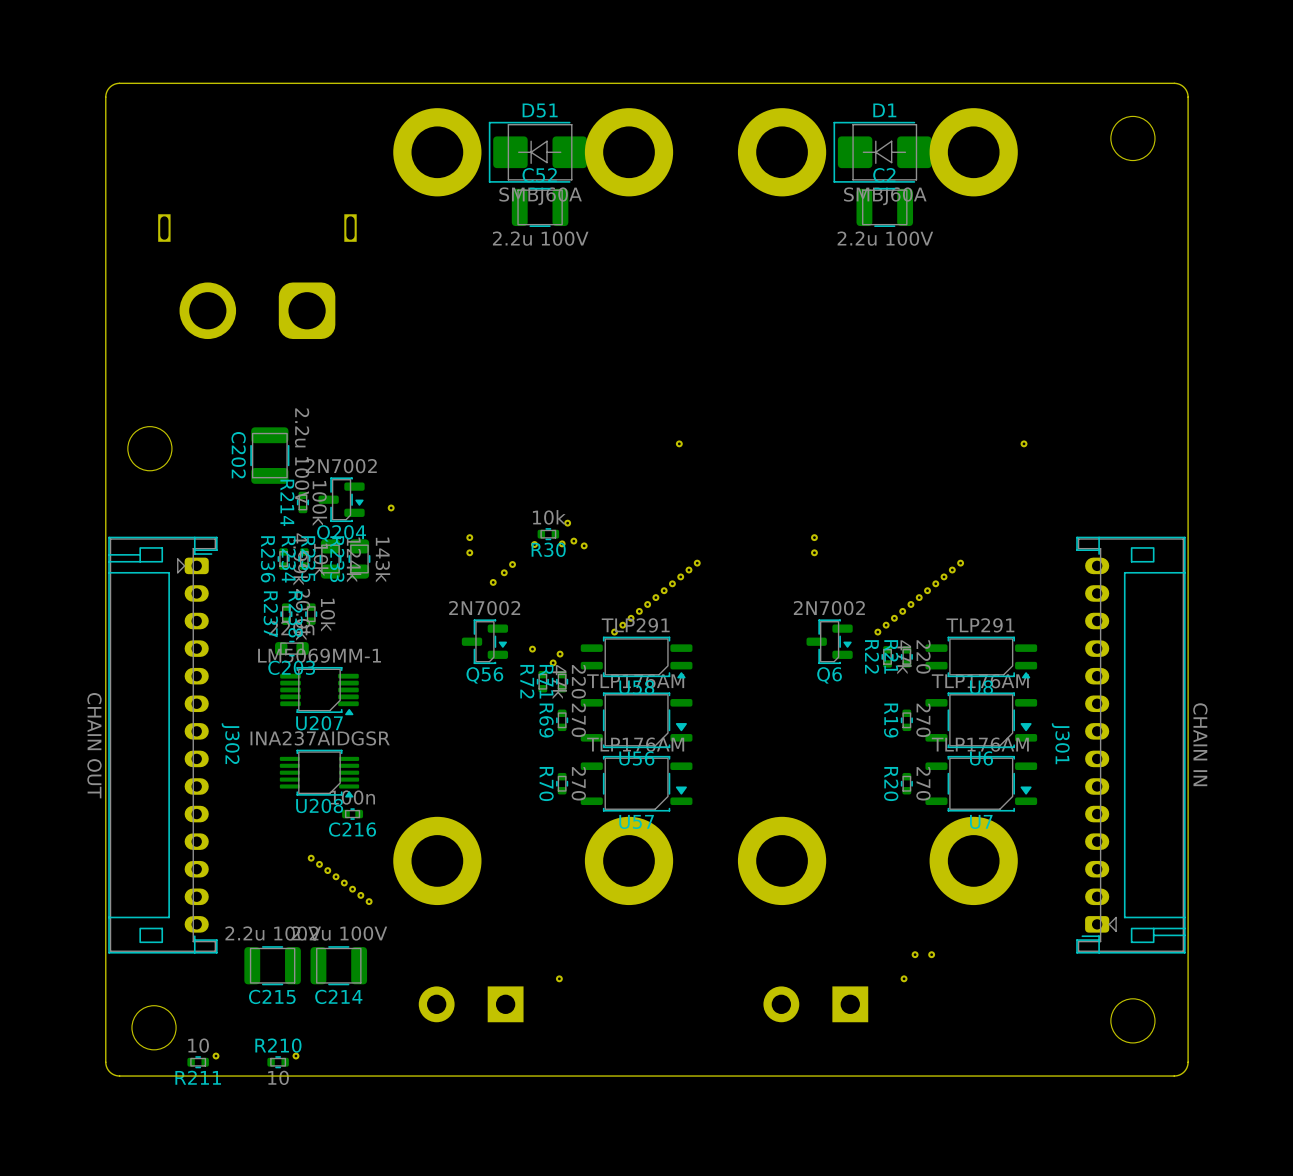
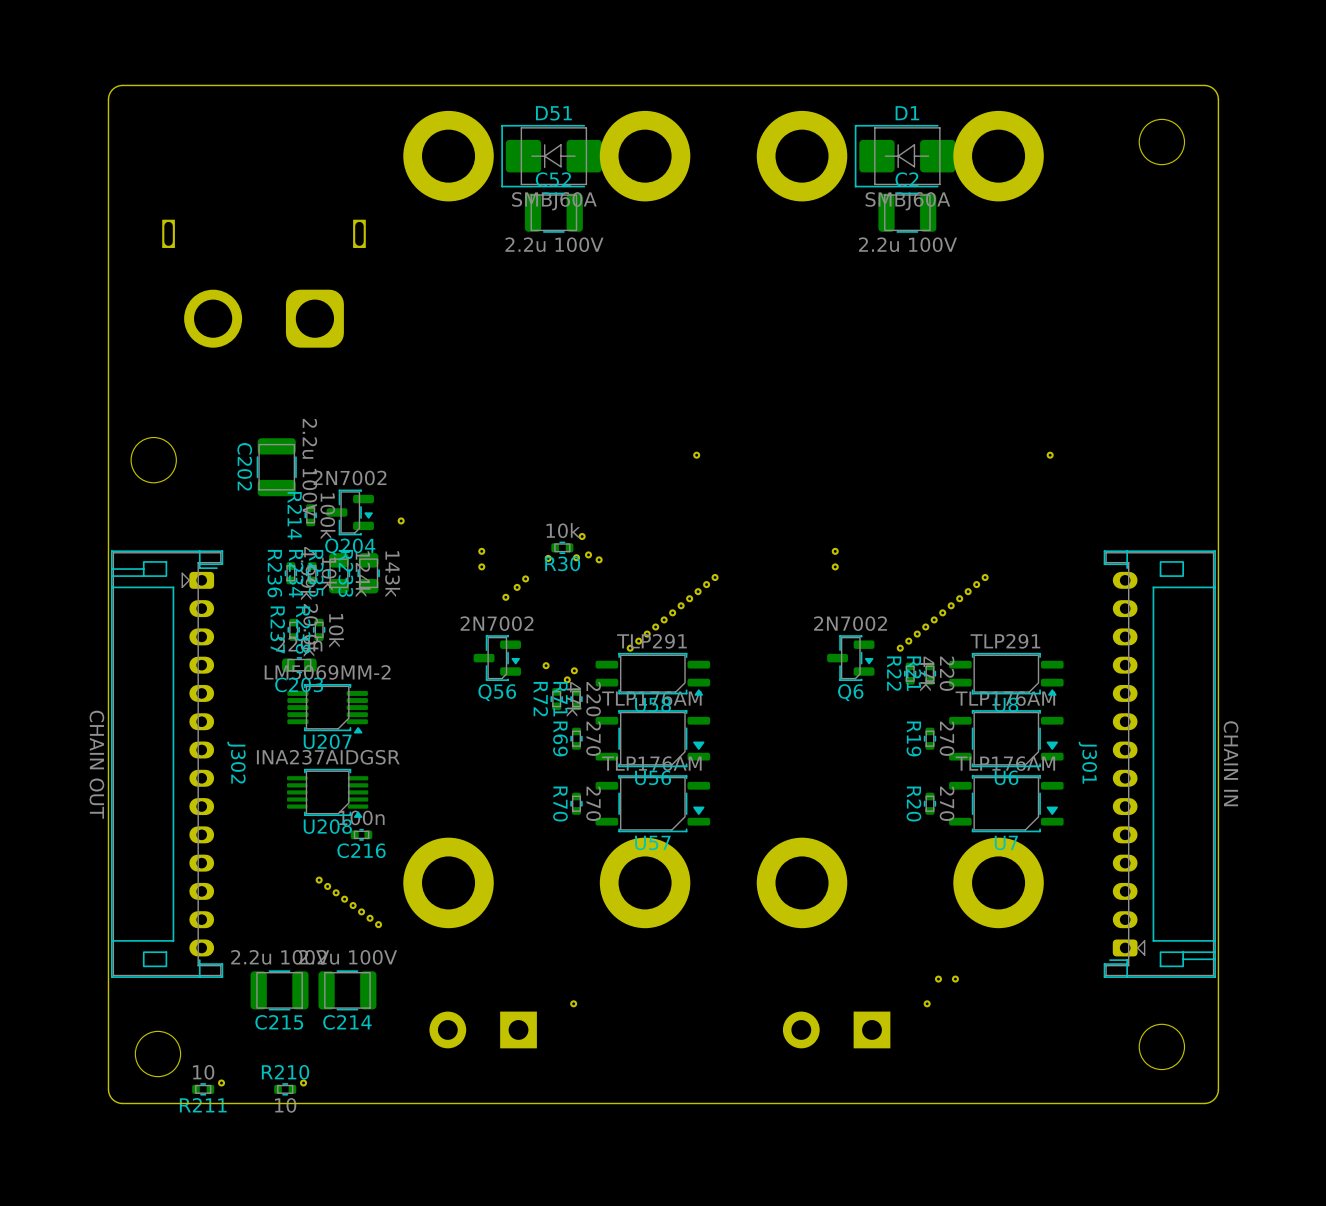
U207 value: LM5069MM-1 (319, 655) -> LM5069MM-2 (327, 672)

